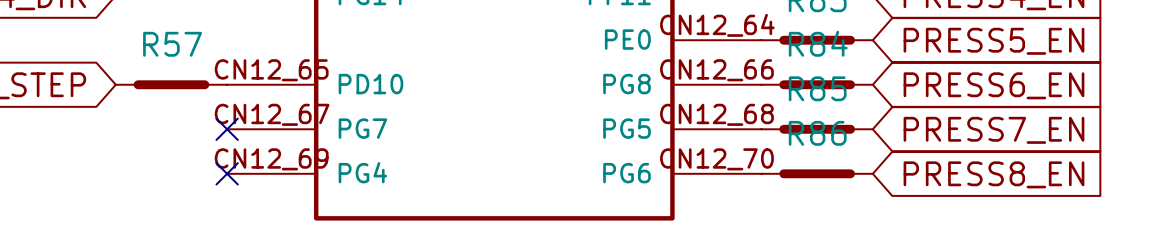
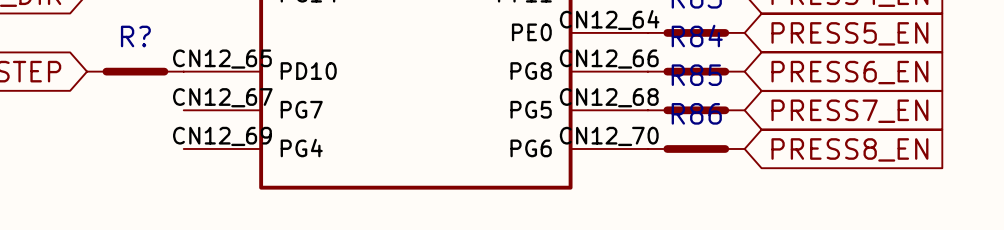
R57 name: R57 (172, 44) -> R? (135, 36)
no-connect mark: (227, 129) -> none
no-connect mark: (227, 173) -> none

